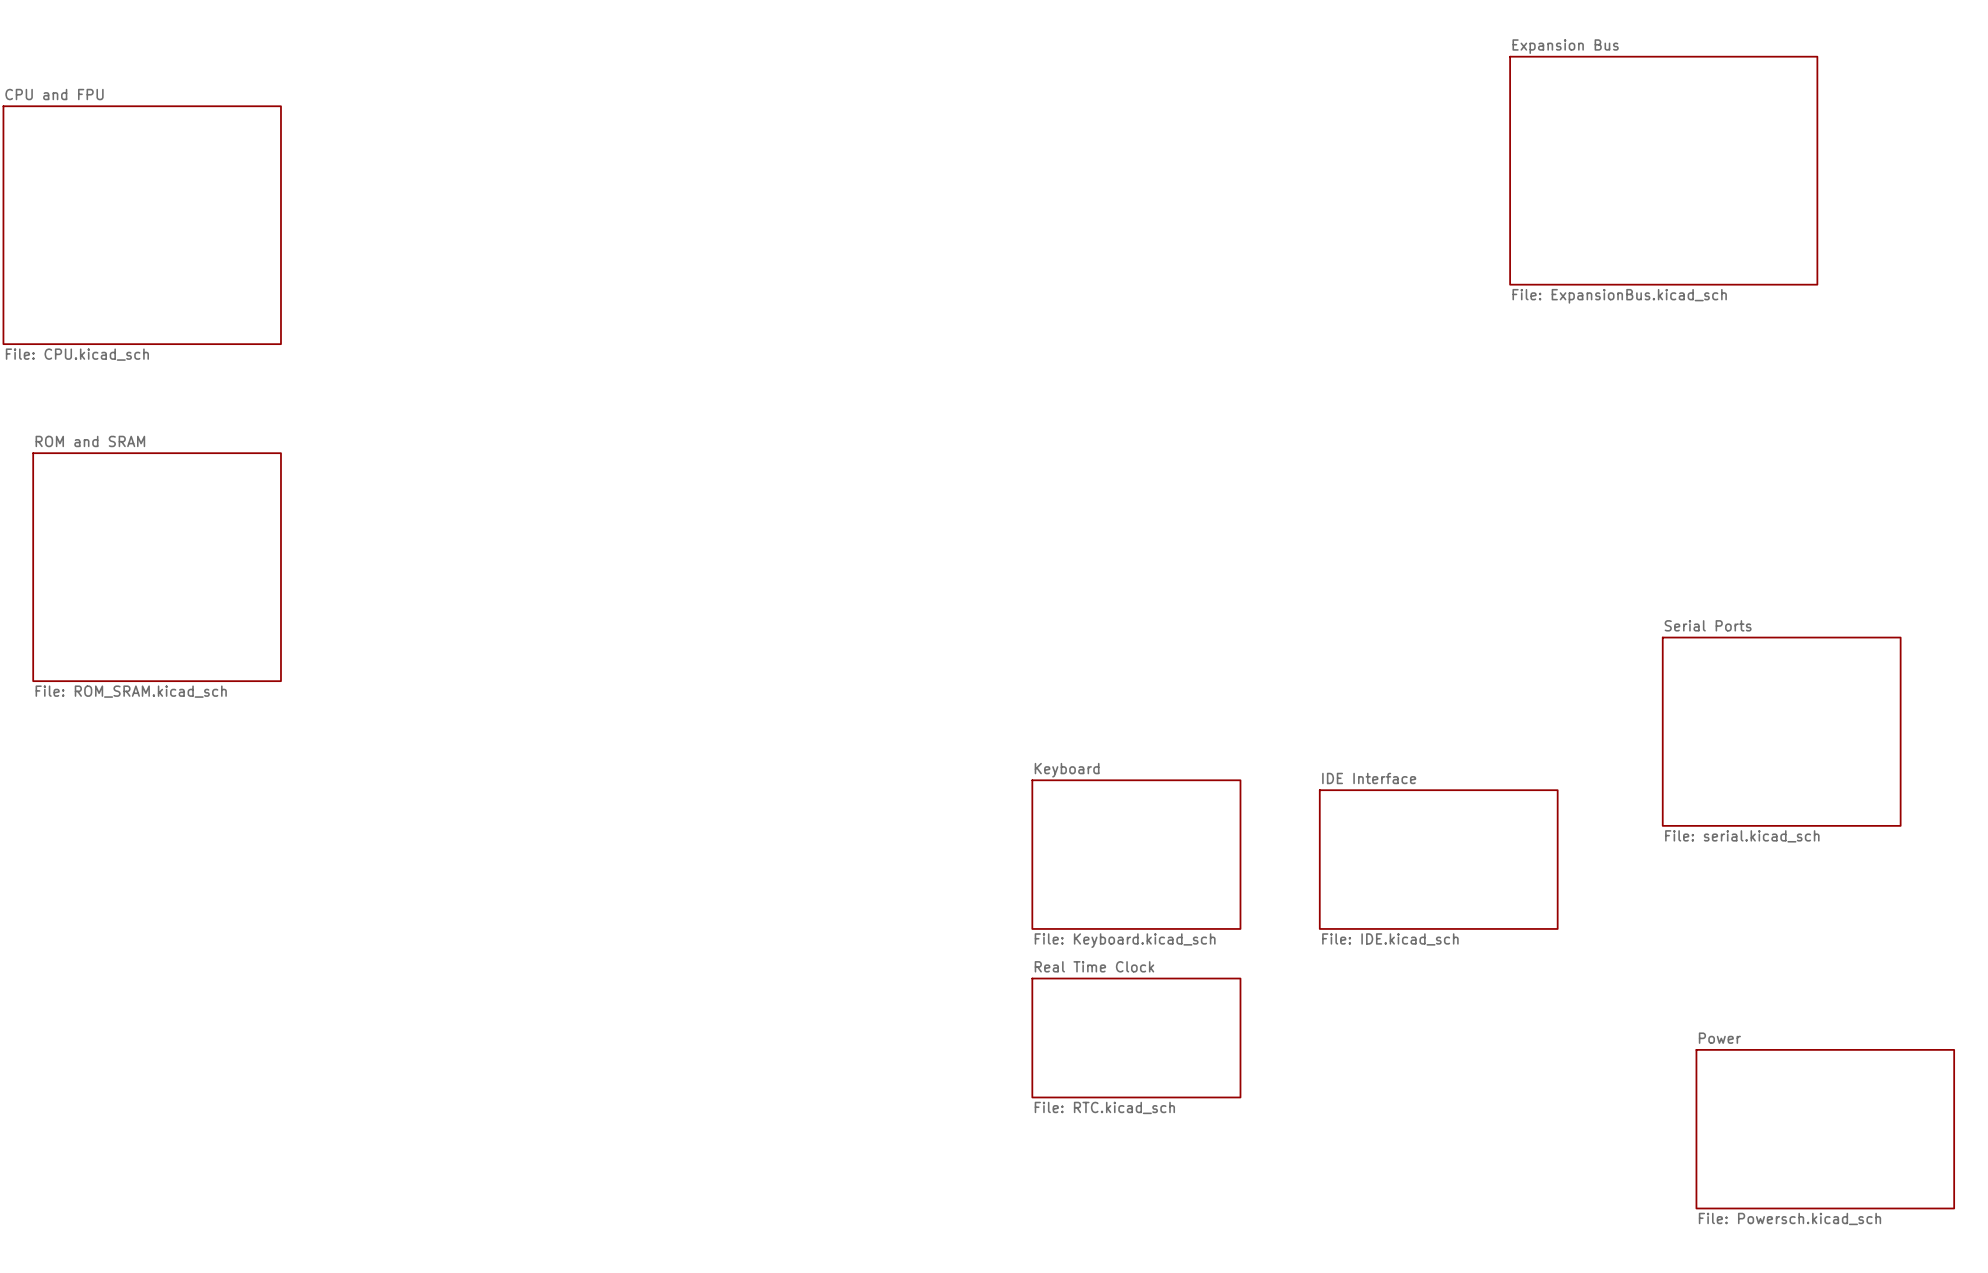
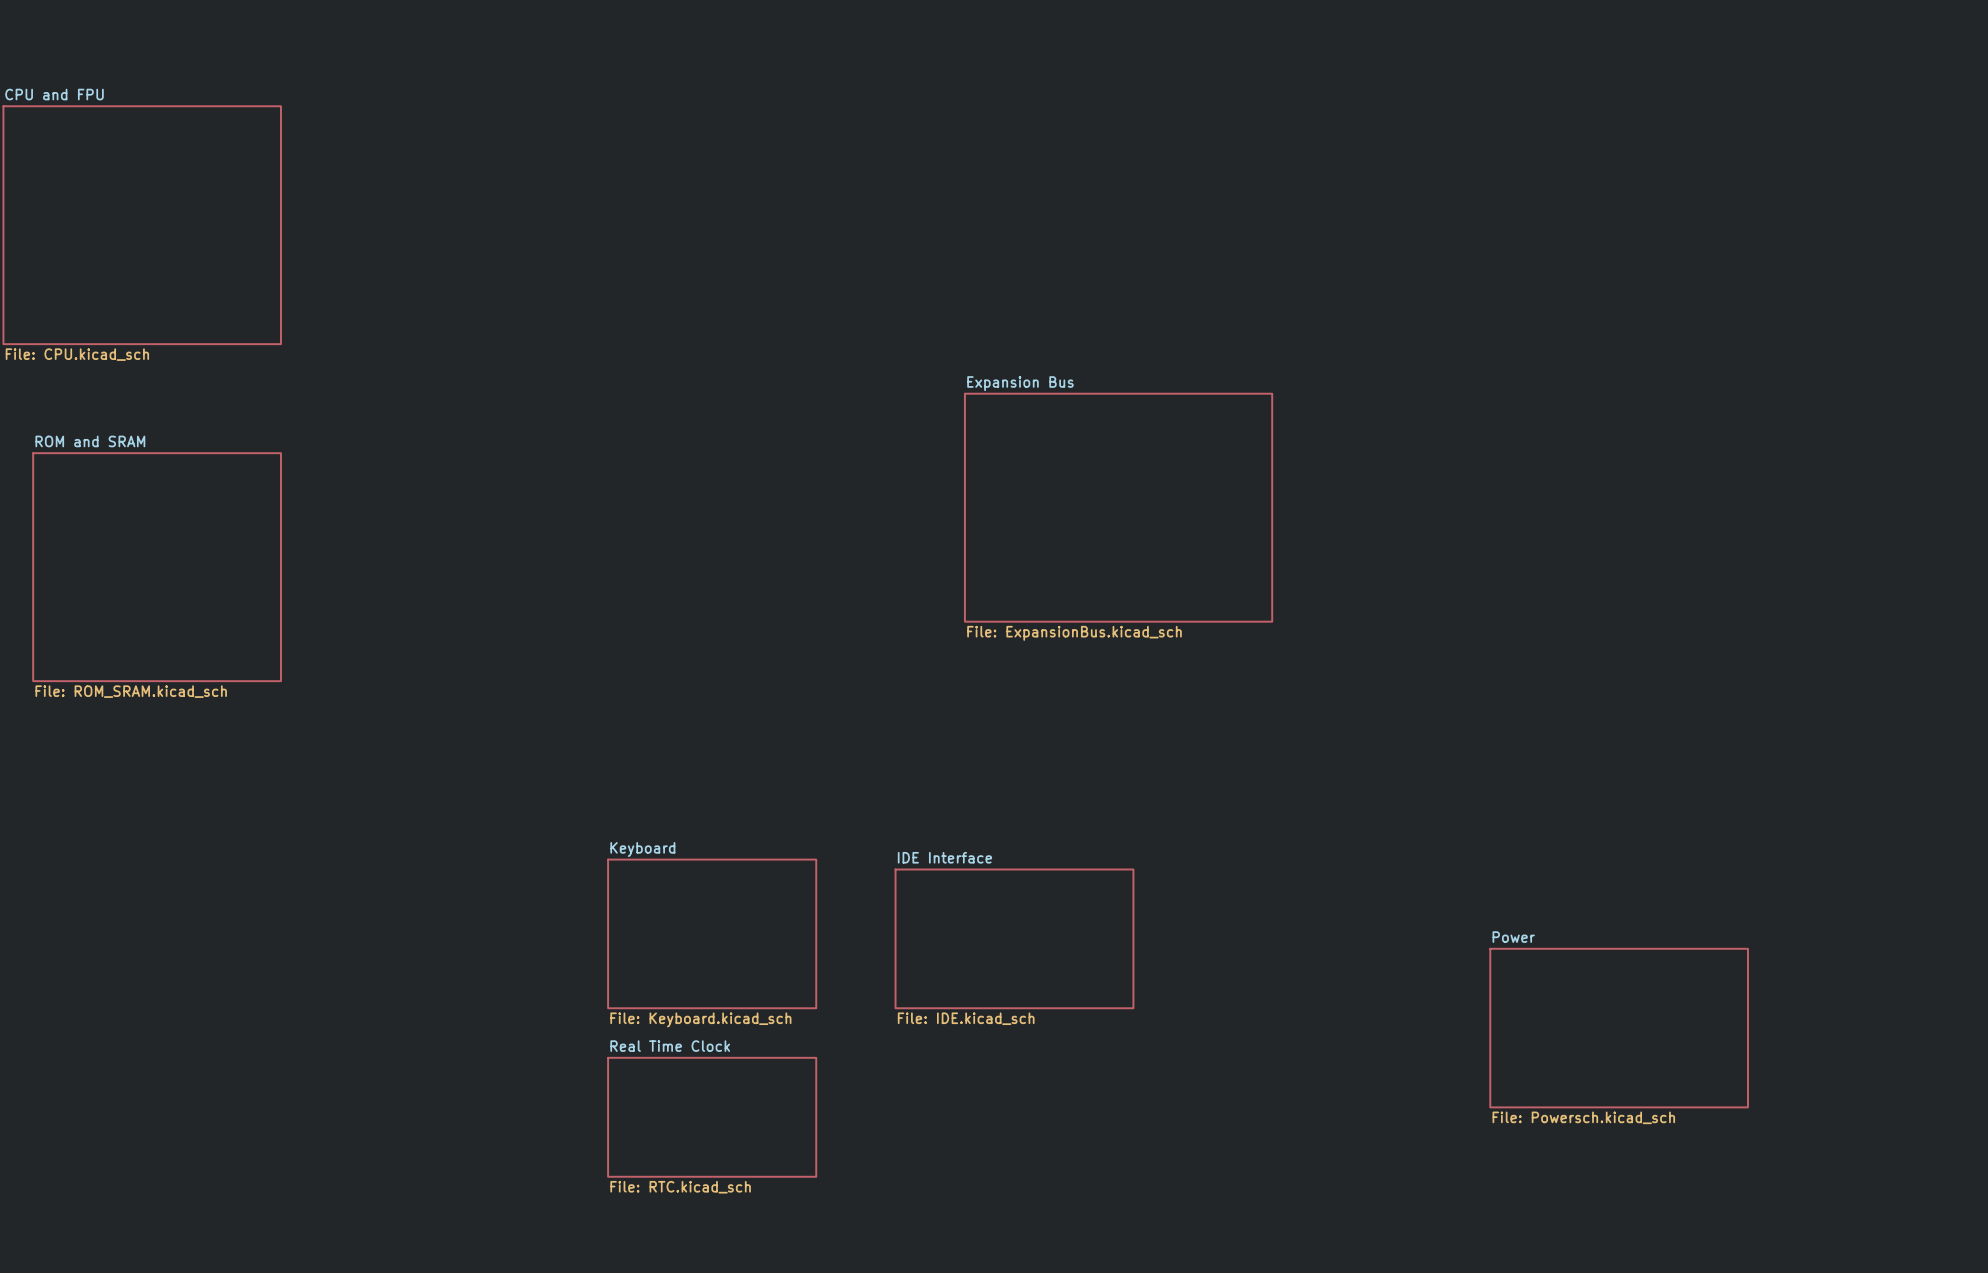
sheet Expansion Bus: File: ExpansionBus.kicad_sch (1663, 170) -> none
sheet Expansion Bus: none -> File: ExpansionBus.kicad_sch (1118, 507)
sheet Serial Ports: File: serial.kicad_sch (1781, 731) -> none
sheet Keyboard: File: Keyboard.kicad_sch (1136, 854) -> none
sheet IDE Interface: File: IDE.kicad_sch (1438, 859) -> none
sheet Keyboard: none -> File: Keyboard.kicad_sch (712, 933)
sheet IDE Interface: none -> File: IDE.kicad_sch (1014, 938)
sheet Power: none -> File: Powersch.kicad_sch (1619, 1028)
sheet Real Time Clock: File: RTC.kicad_sch (1136, 1038) -> none
sheet Real Time Clock: none -> File: RTC.kicad_sch (712, 1117)
sheet Power: File: Powersch.kicad_sch (1825, 1129) -> none

